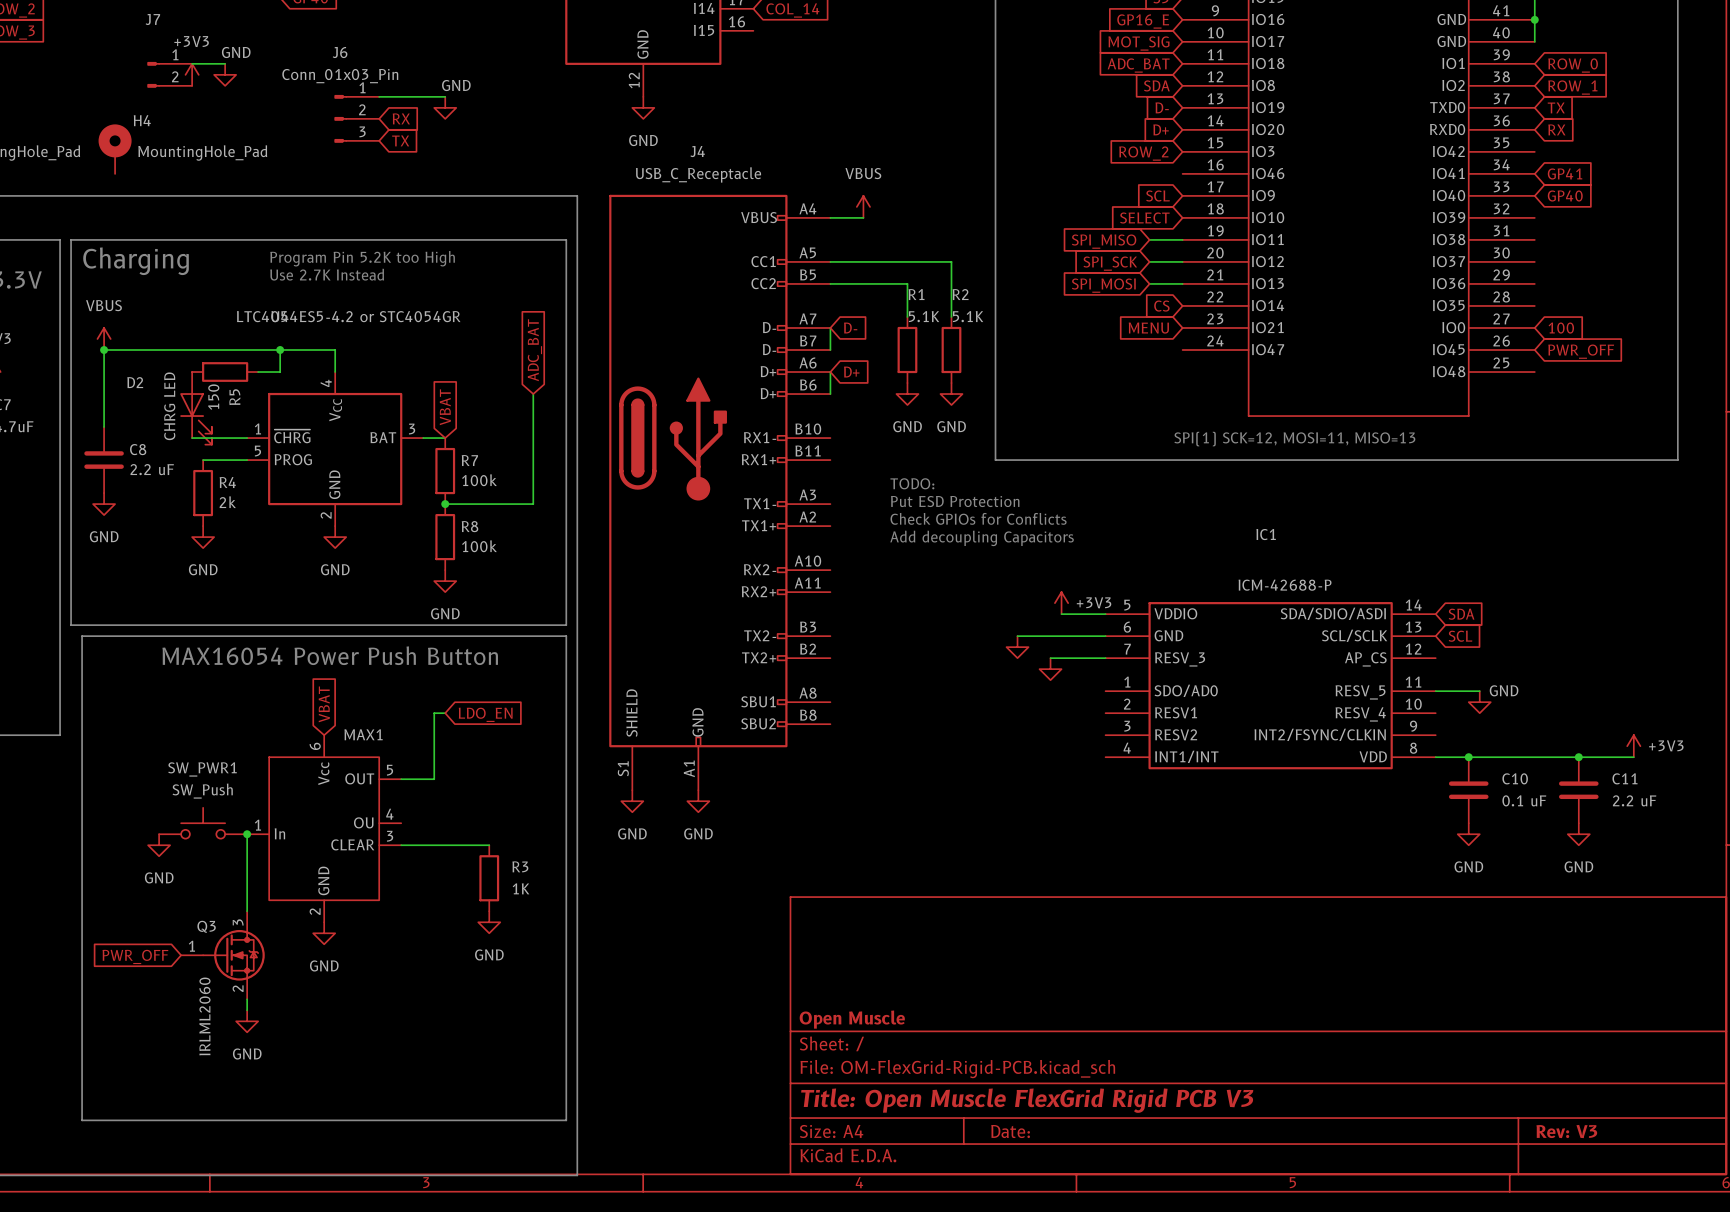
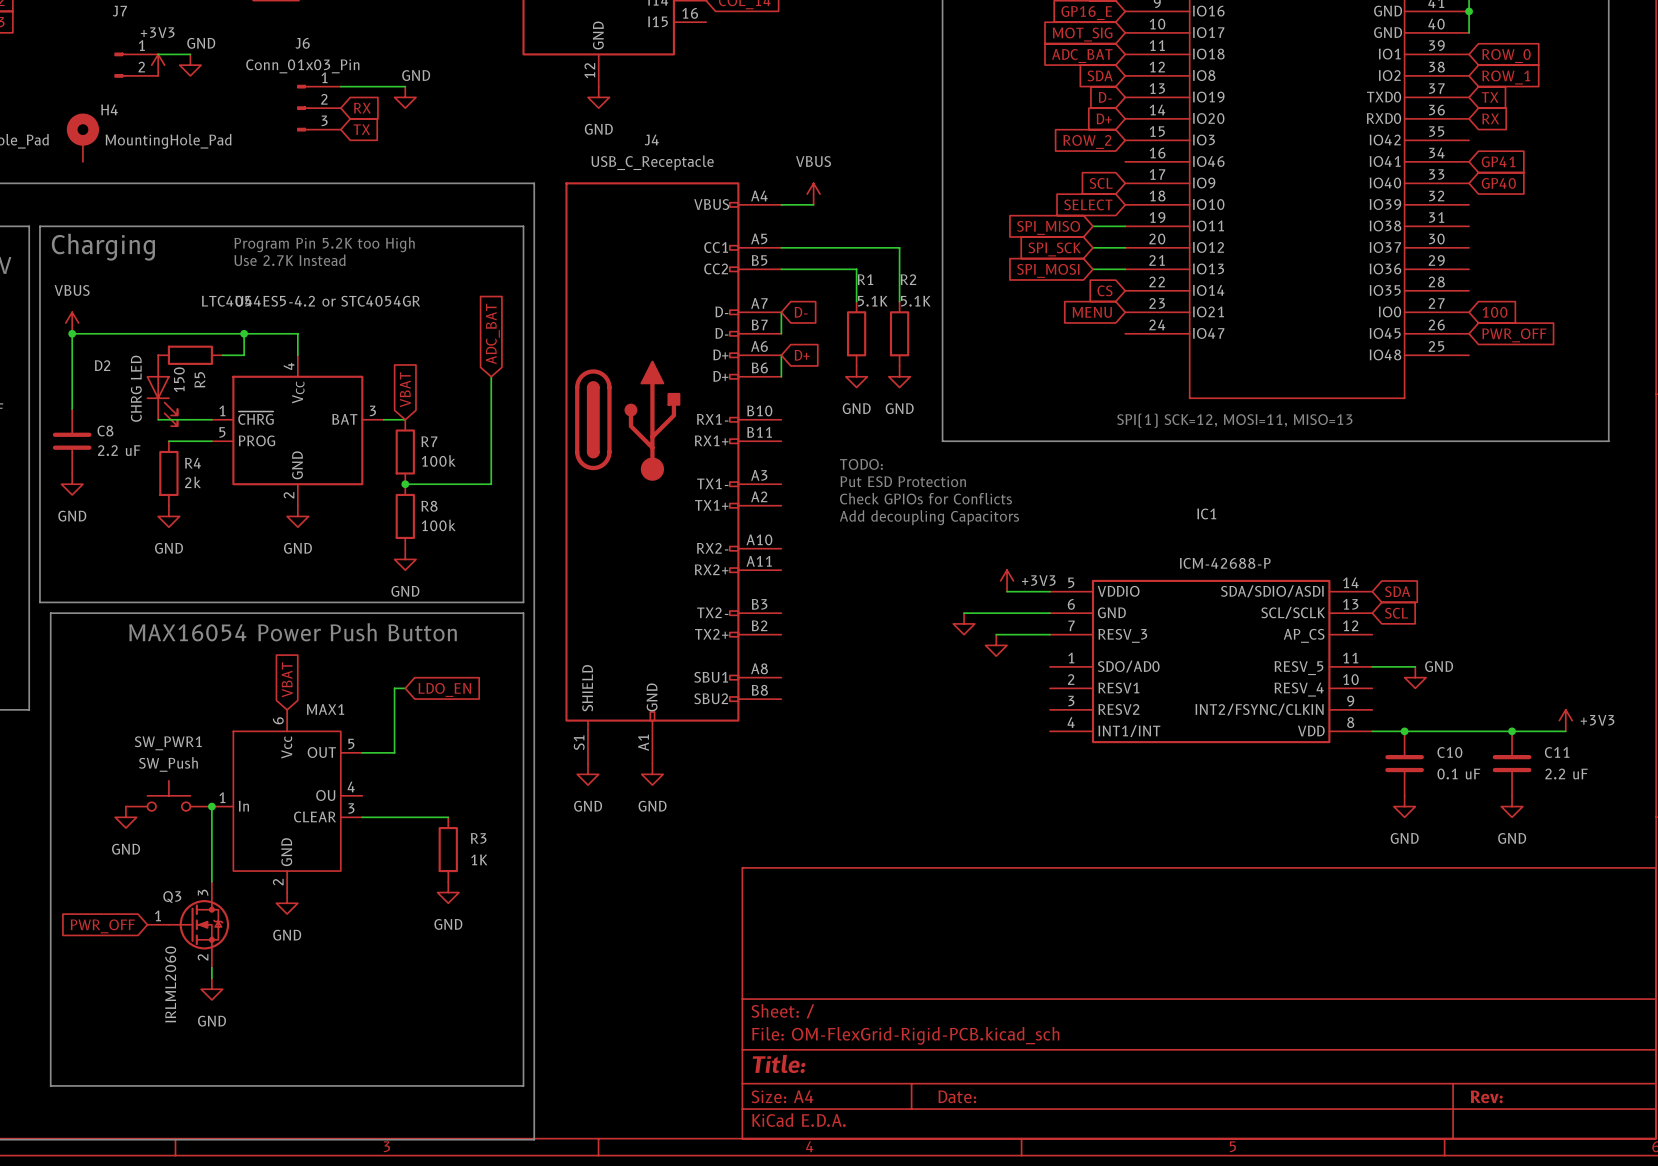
title block: Open Muscle (852, 1019) -> none
title block: Title: Open Muscle FlexGrid Rigid PCB V3 (1027, 1100) -> Title: (779, 1063)
title block: Rev: V3 (1566, 1131) -> Rev: (1486, 1096)

